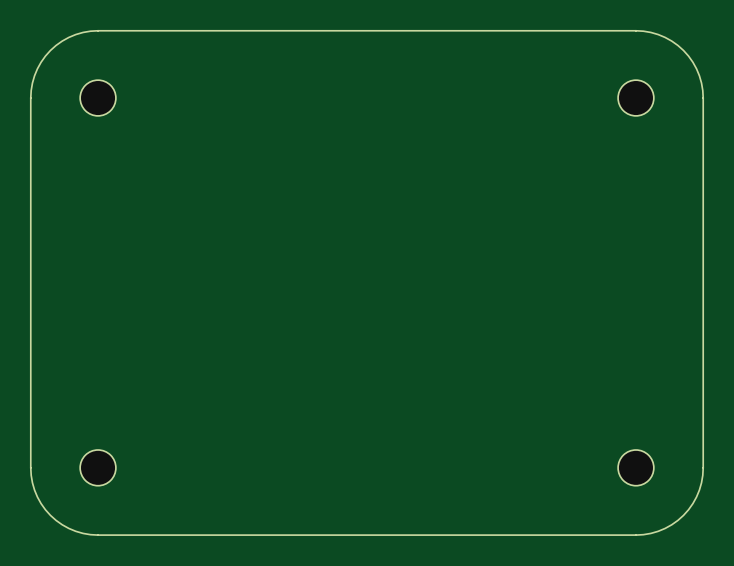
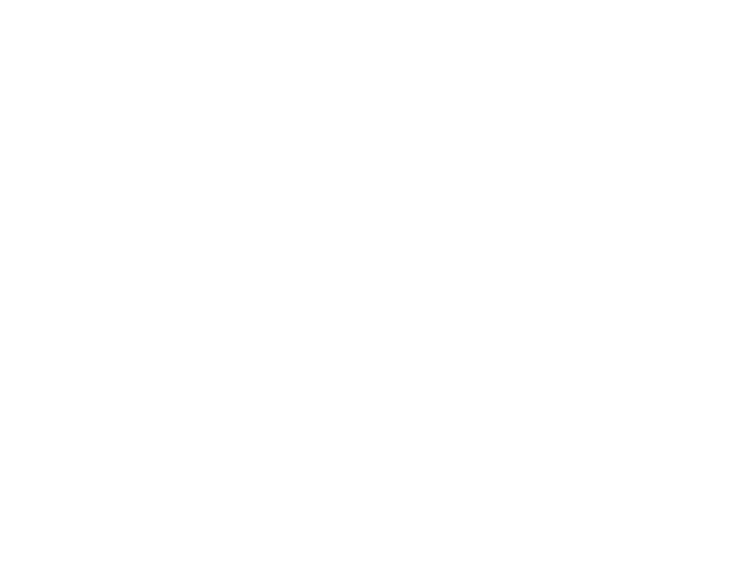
board edge: (635, 30) (98, 30) (75, 34) (56, 45) (45, 56) (37, 68) (32, 83) (30, 98) (30, 467) (34, 490) (45, 509) (56, 520) (68, 528) (83, 533) (98, 535) (635, 535) (658, 531) (677, 520) (688, 509) (696, 497) (702, 475) (702, 90) (696, 68) (683, 50) (665, 37) (650, 32) (635, 30) -> none
part: (98, 98) -> none
part: (635, 98) -> none
part: (98, 467) -> none
part: (635, 467) -> none

